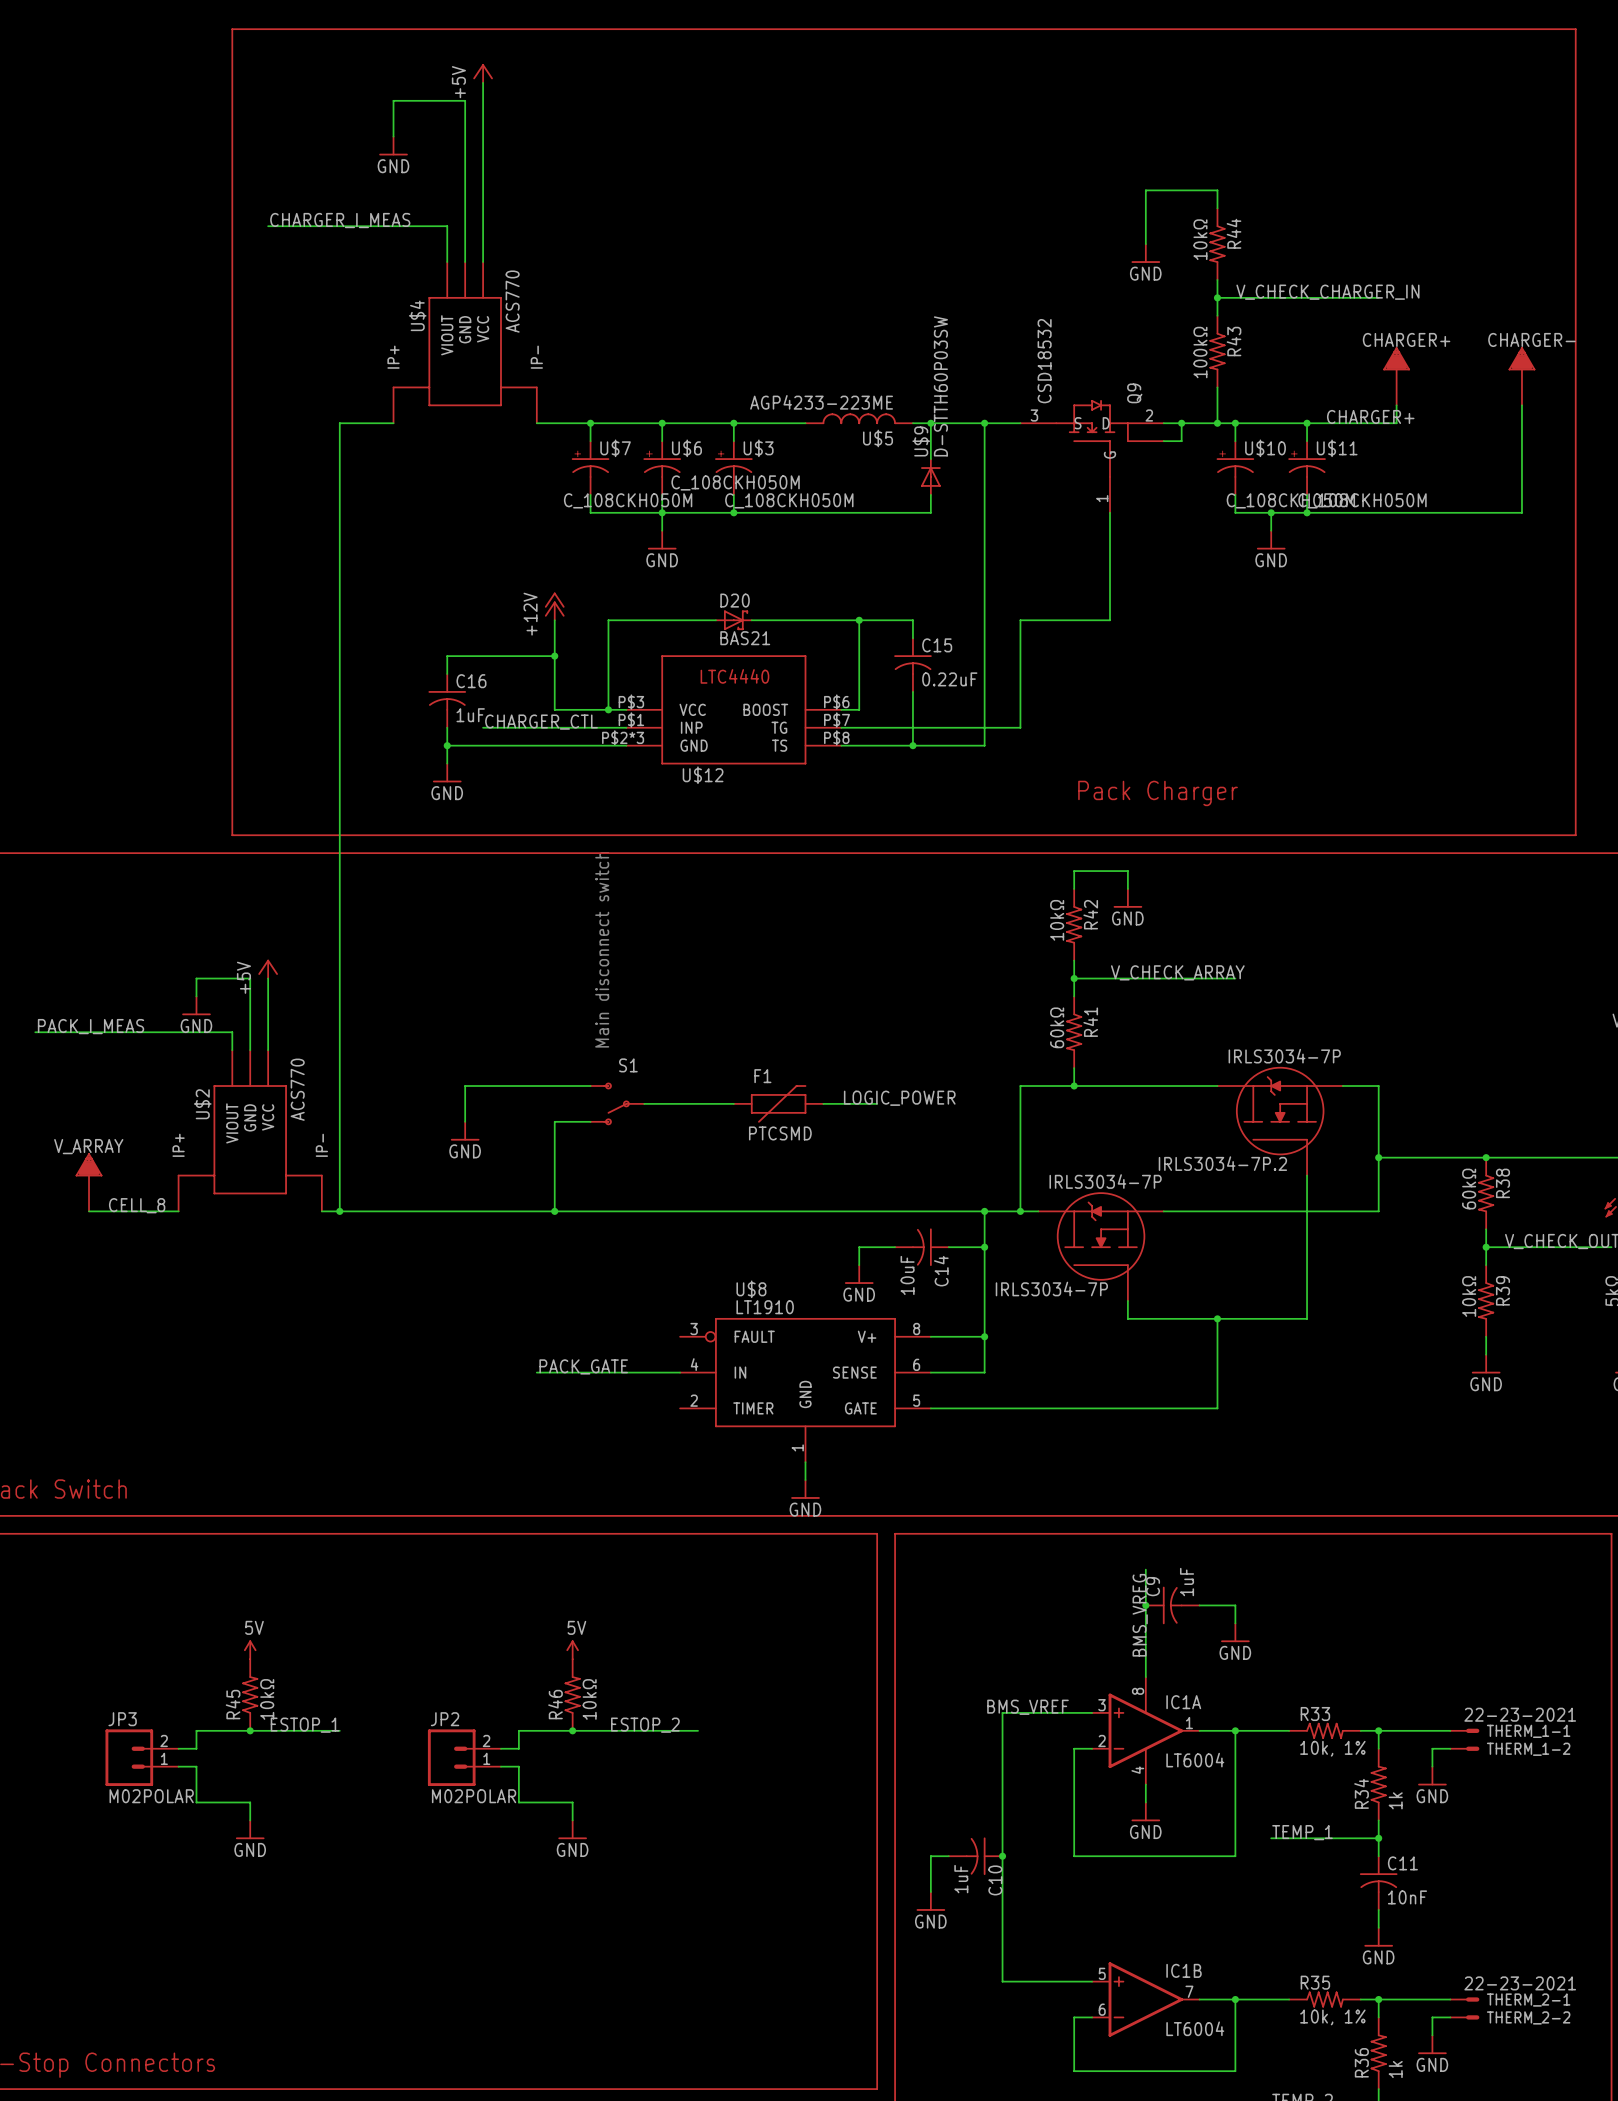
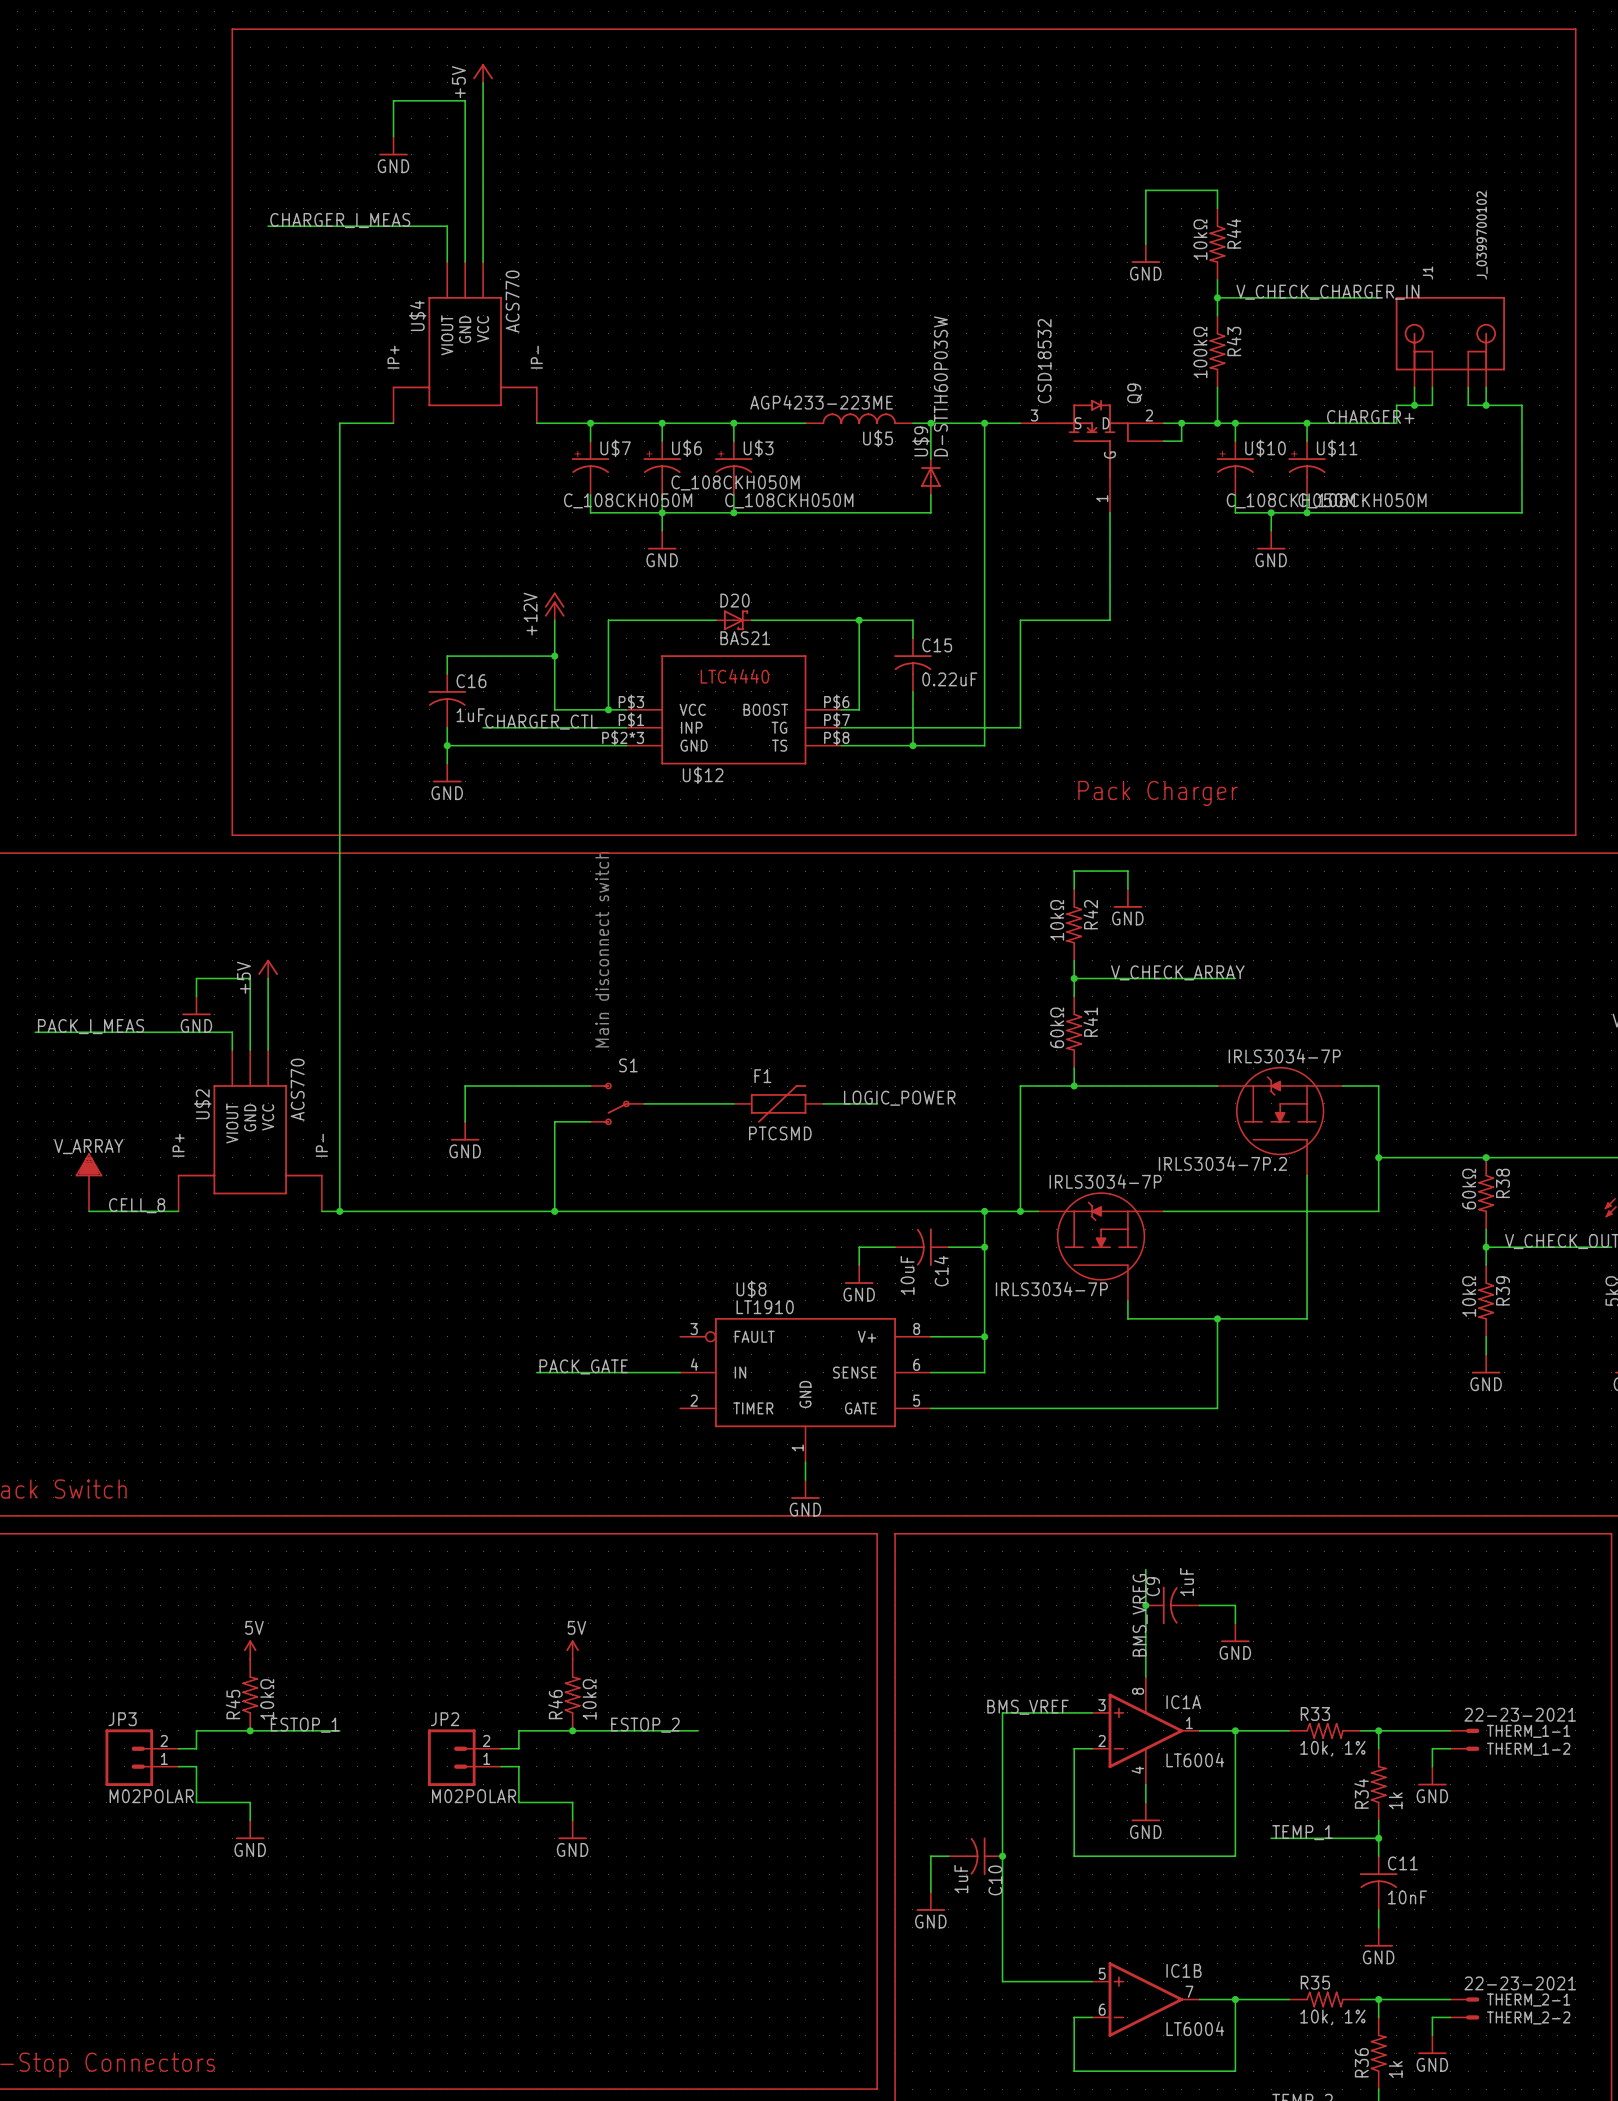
J1: none -> J_0399700102 (1450, 342)
CHARGER+: (1396, 376) -> none
CHARGER-: (1521, 376) -> none
wire: none -> (1414, 387) (1414, 405)
wire: none -> (1432, 387) (1432, 405) (1396, 405)
wire: none -> (1468, 387) (1468, 405) (1521, 405)
wire: none -> (1486, 387) (1486, 405)
junction: none -> (1414, 405)
junction: none -> (1486, 405)

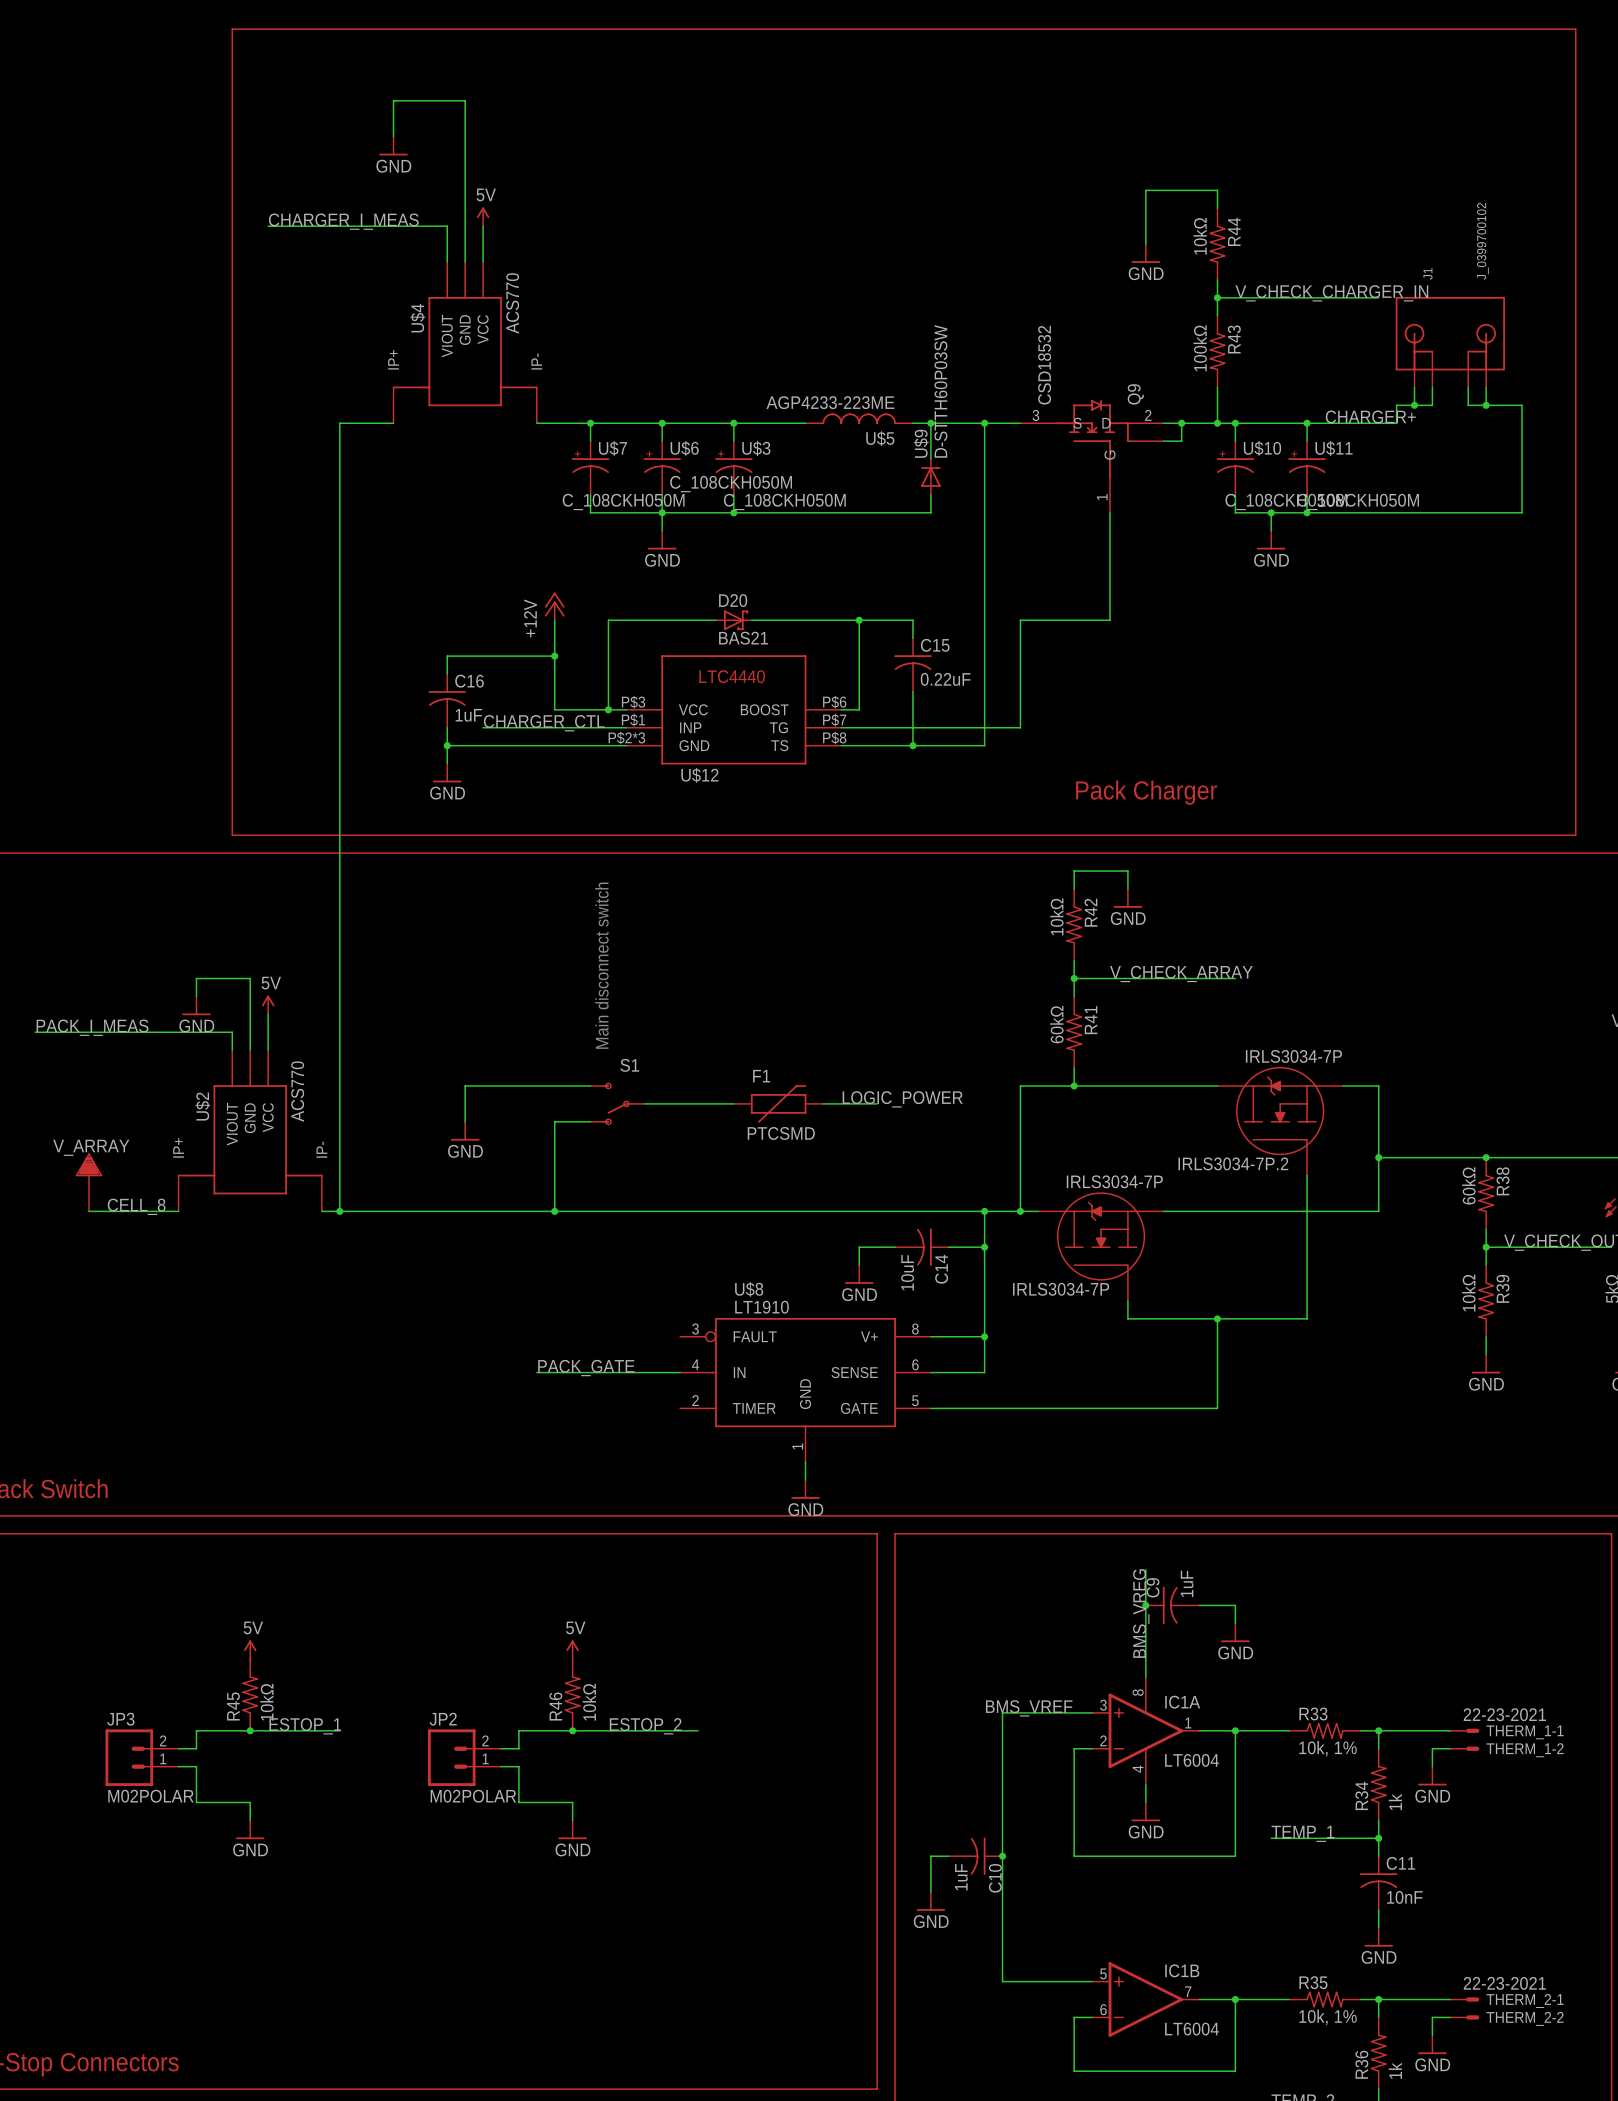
power symbol: +5V (483, 73) -> none
wire: (483, 82) (483, 226) -> none
power symbol: none -> 5V (483, 216)
power symbol: +5V (268, 969) -> none
power symbol: none -> 5V (268, 1004)

